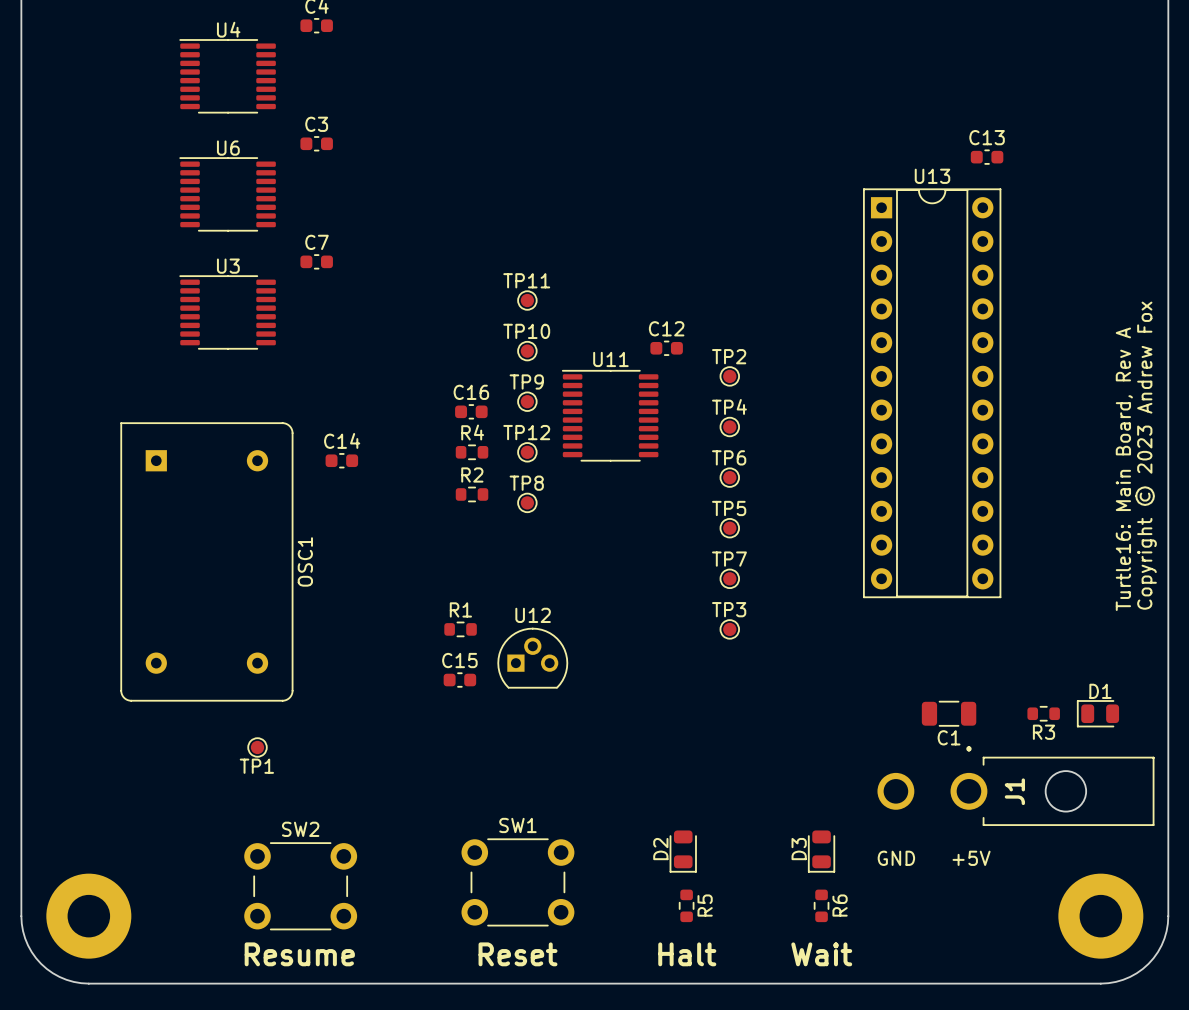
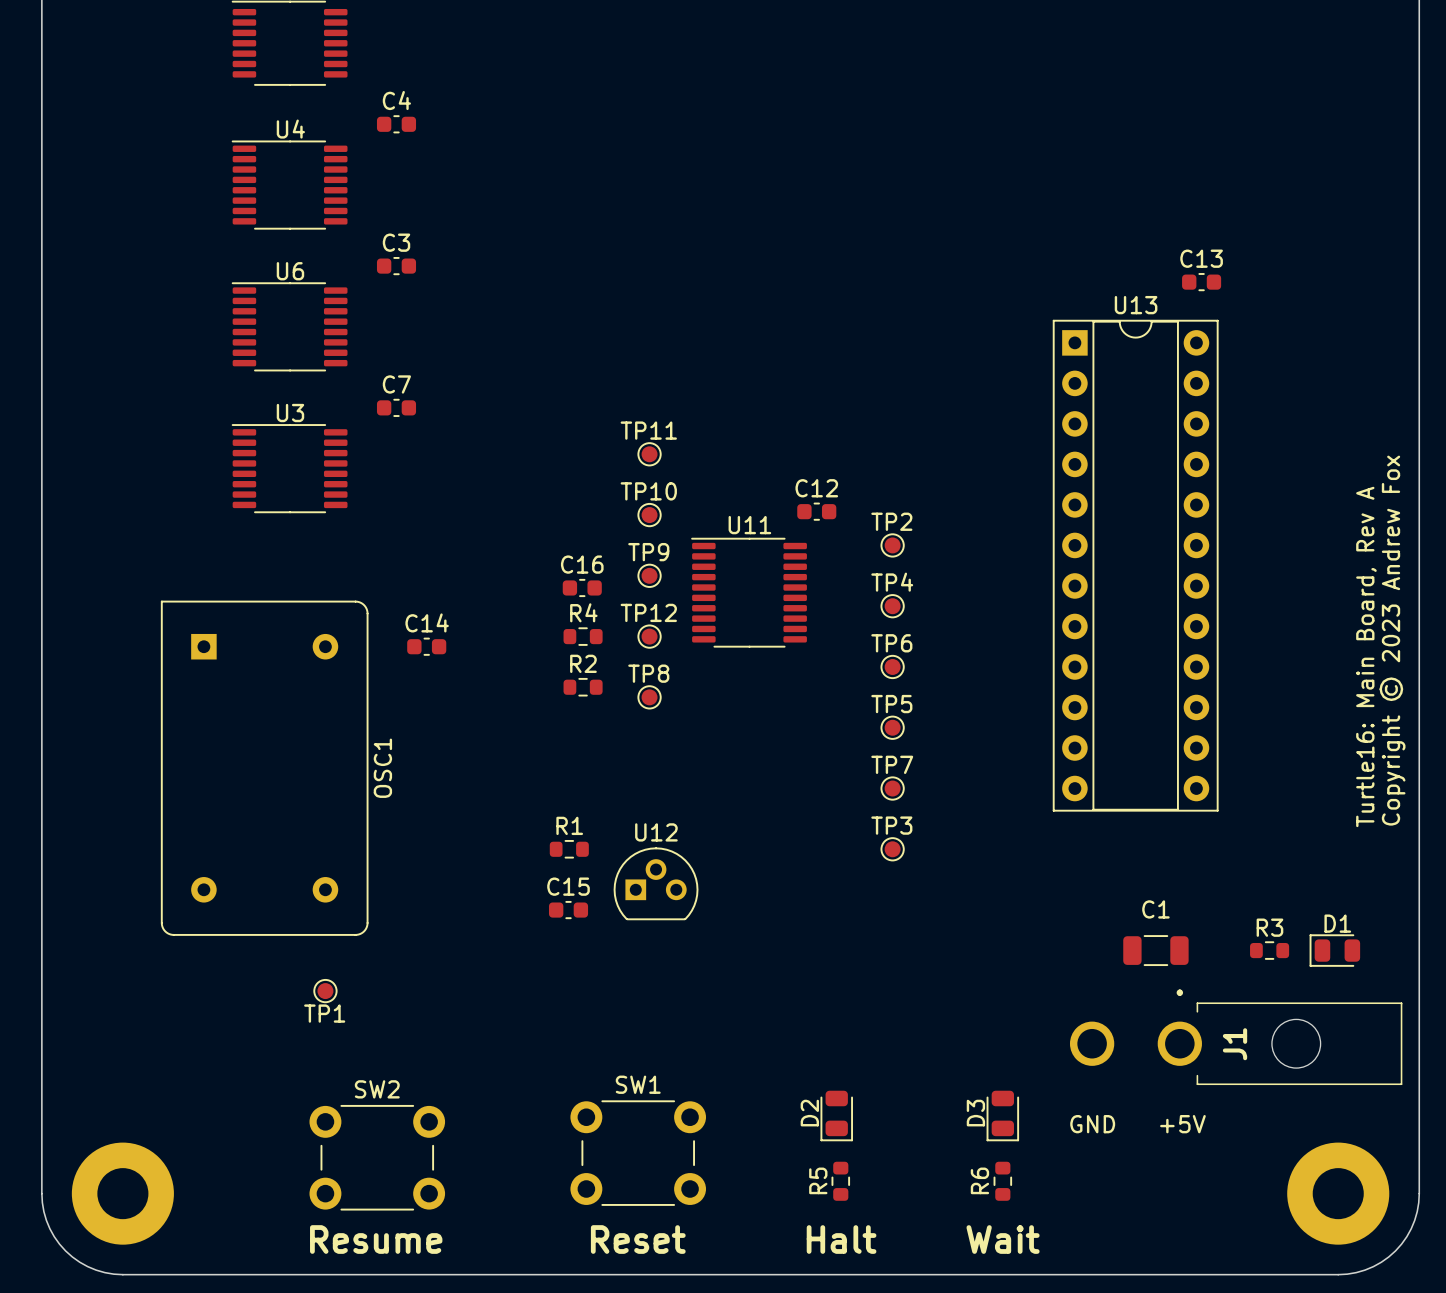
R3 name position: R3 (1043, 732) -> R3 (1269, 927)
C1 name position: C1 (949, 737) -> C1 (1155, 909)
R5 name position: R5 (705, 905) -> R5 (818, 1180)
R6 name position: R6 (840, 905) -> R6 (979, 1180)

